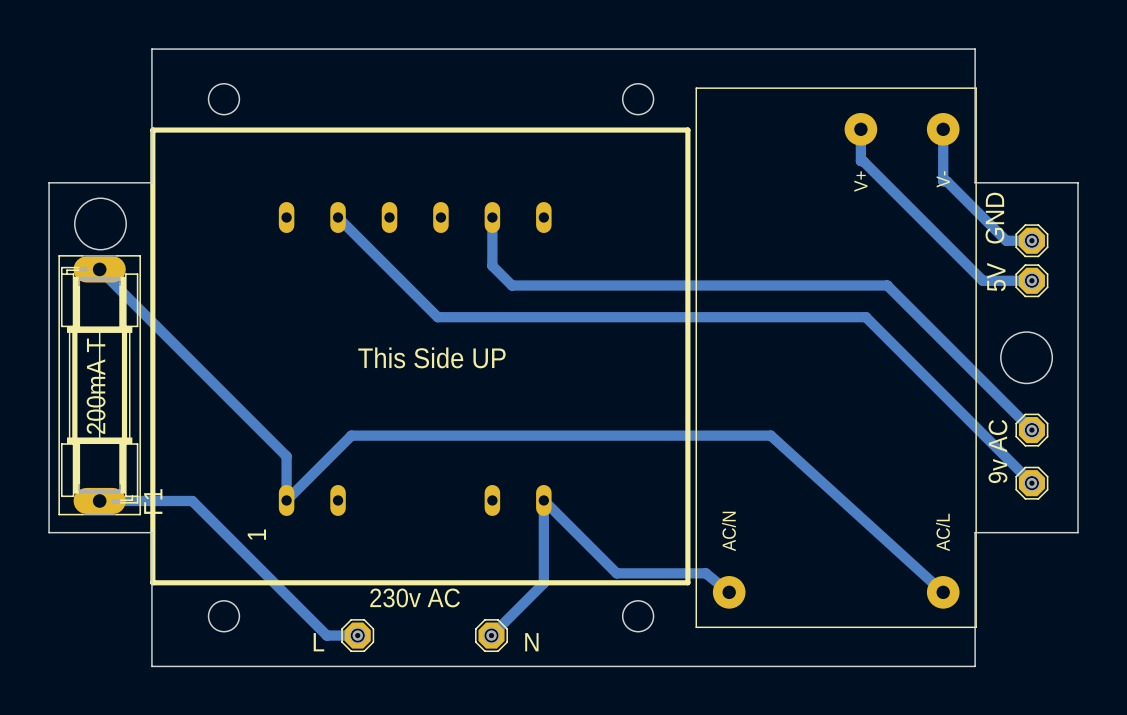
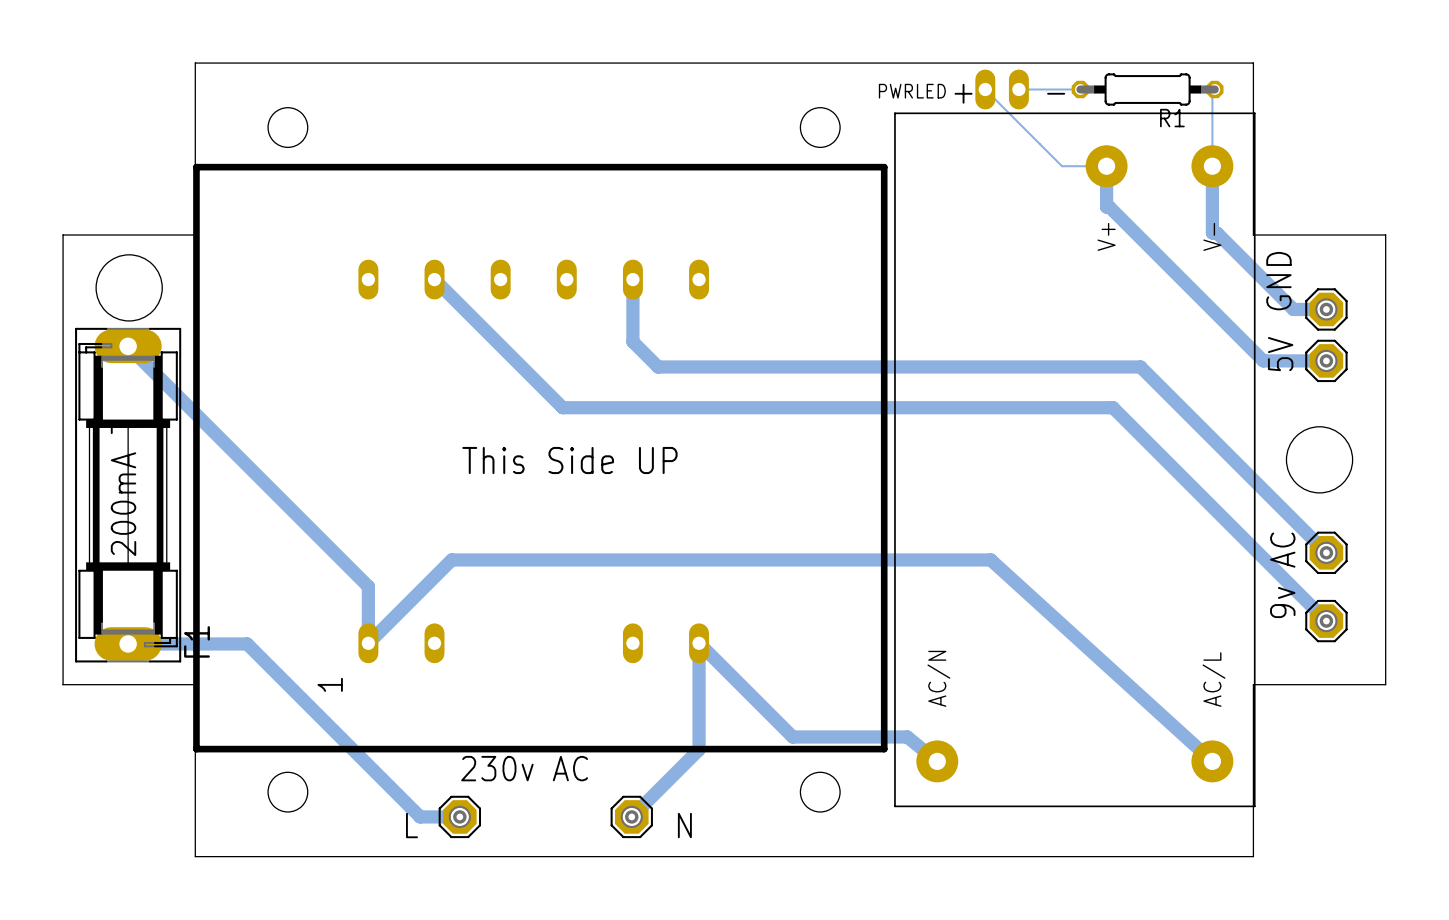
bottom track: none -> (985, 89) (1062, 166) (1106, 166)
PWRLED: none -> (1002, 89)
bottom track: none -> (1018, 89) (1080, 89)
R1: none -> (1147, 89)
bottom track: none -> (1214, 89) (1212, 91) (1212, 166)
text: none -> + (963, 93)
text: none -> - (1056, 93)

